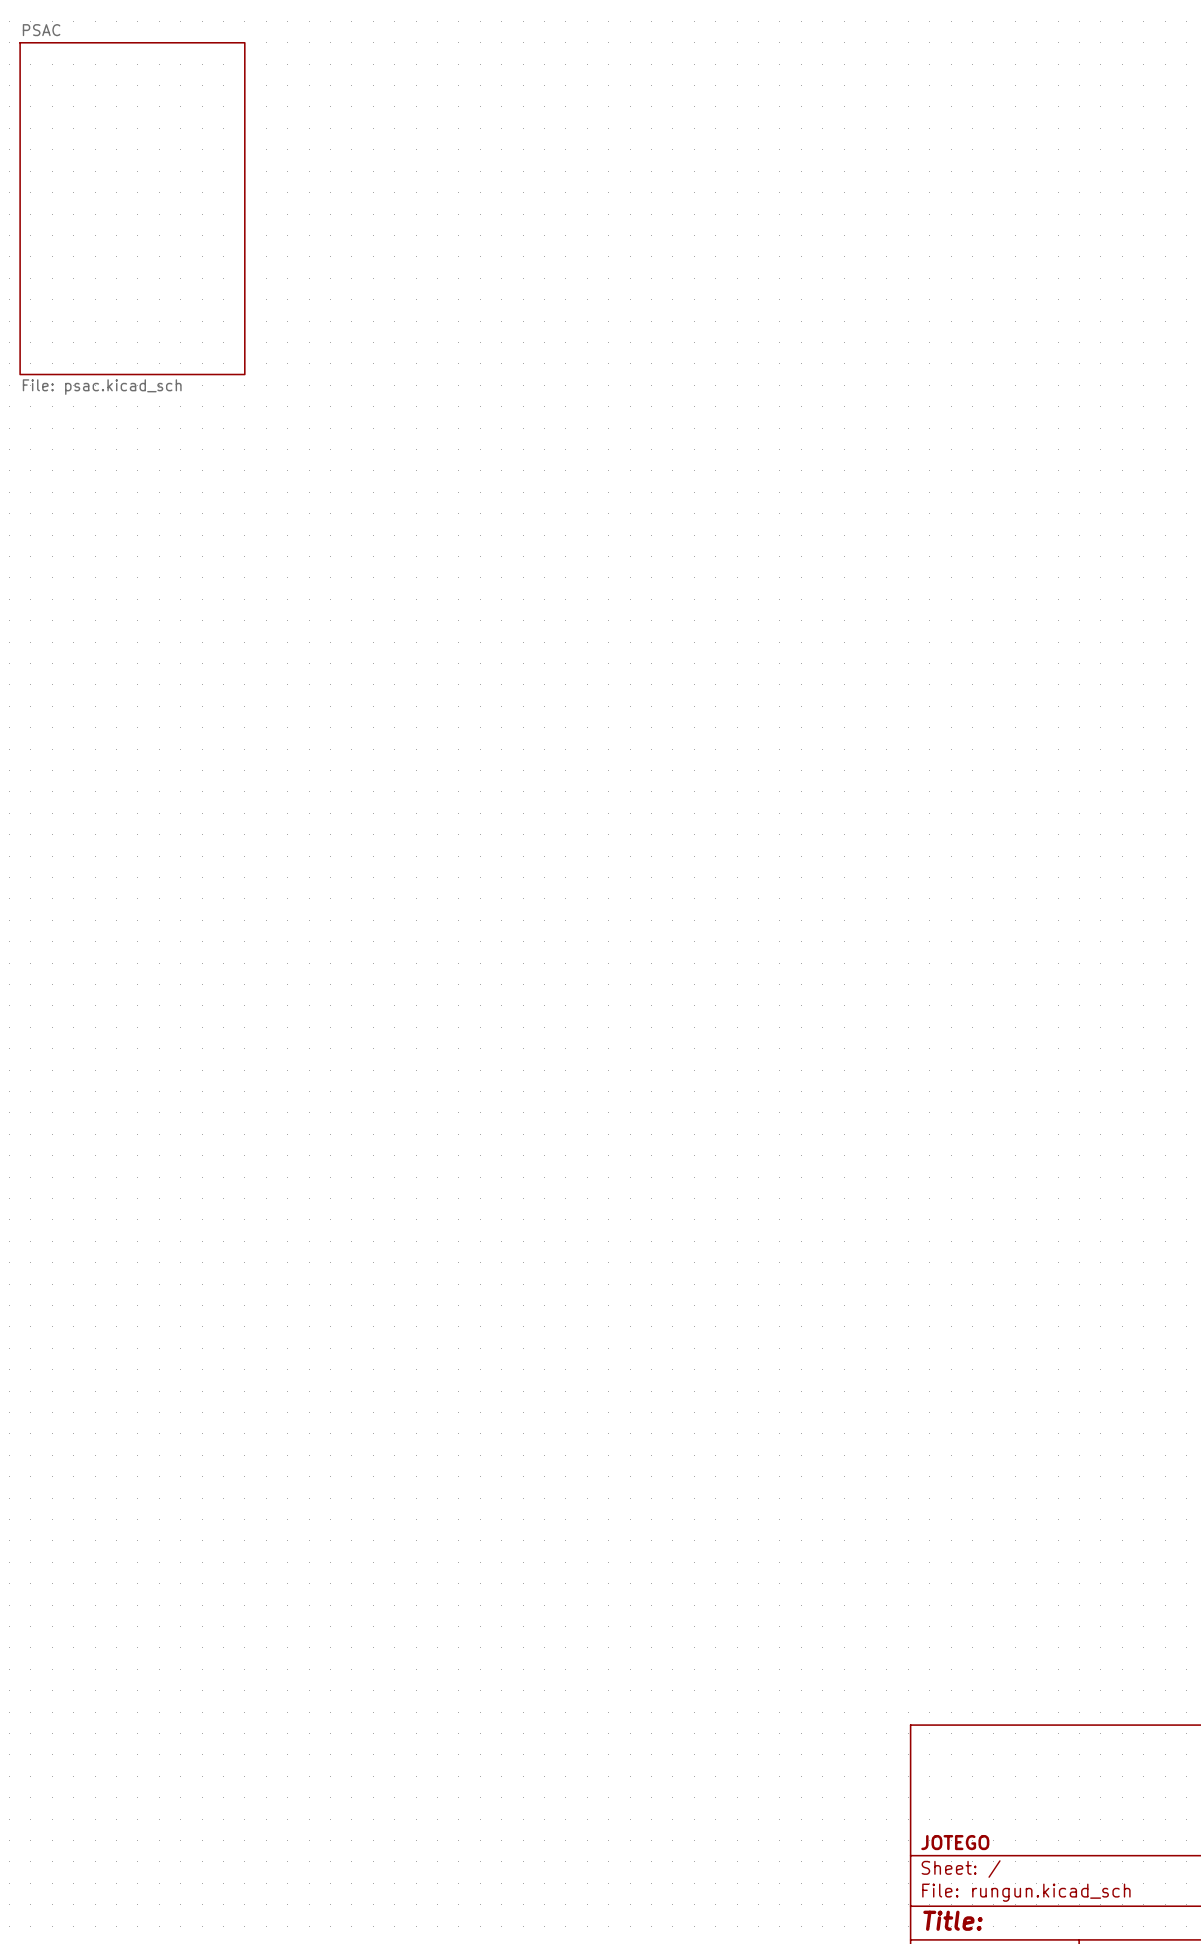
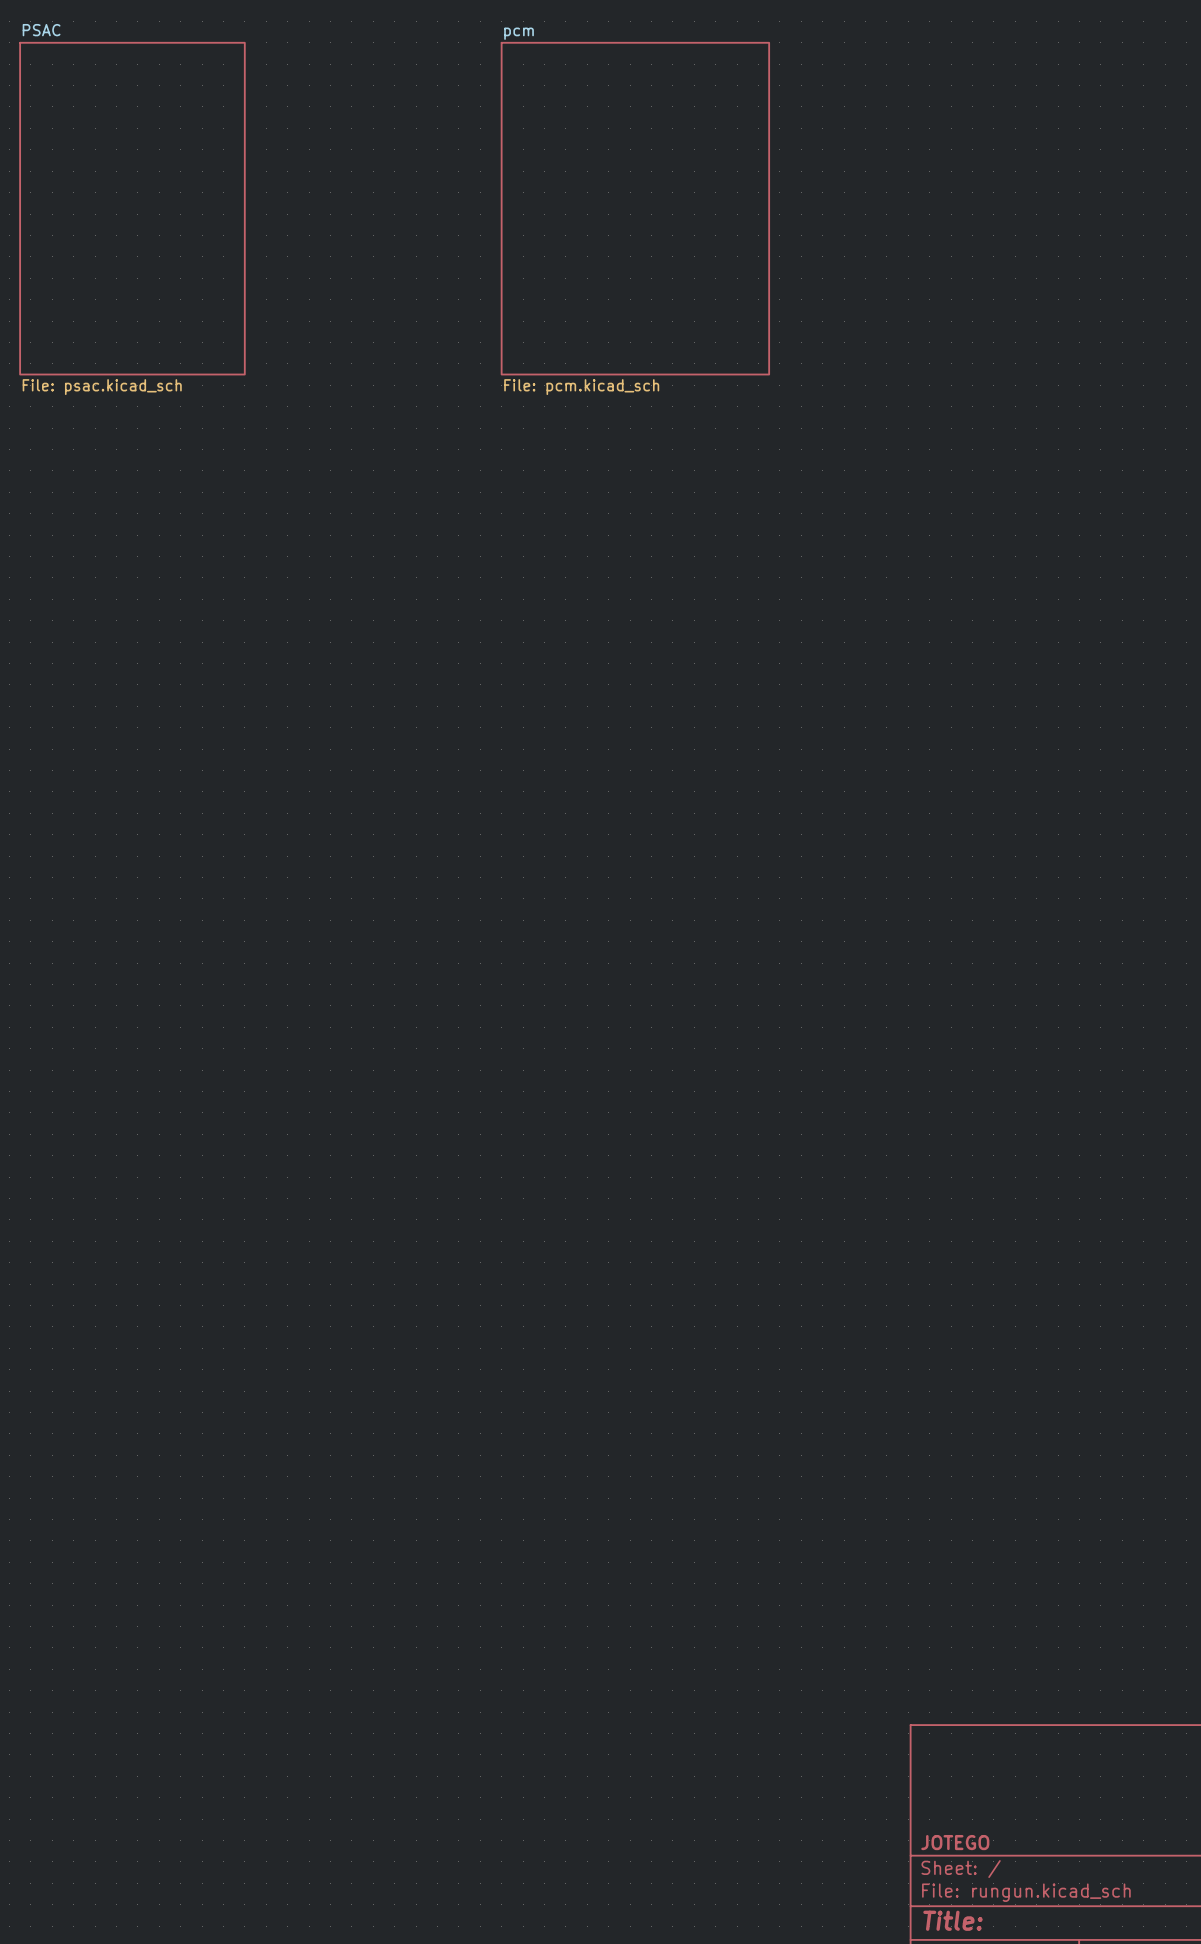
sheet pcm: none -> File: pcm.kicad_sch (635, 208)

